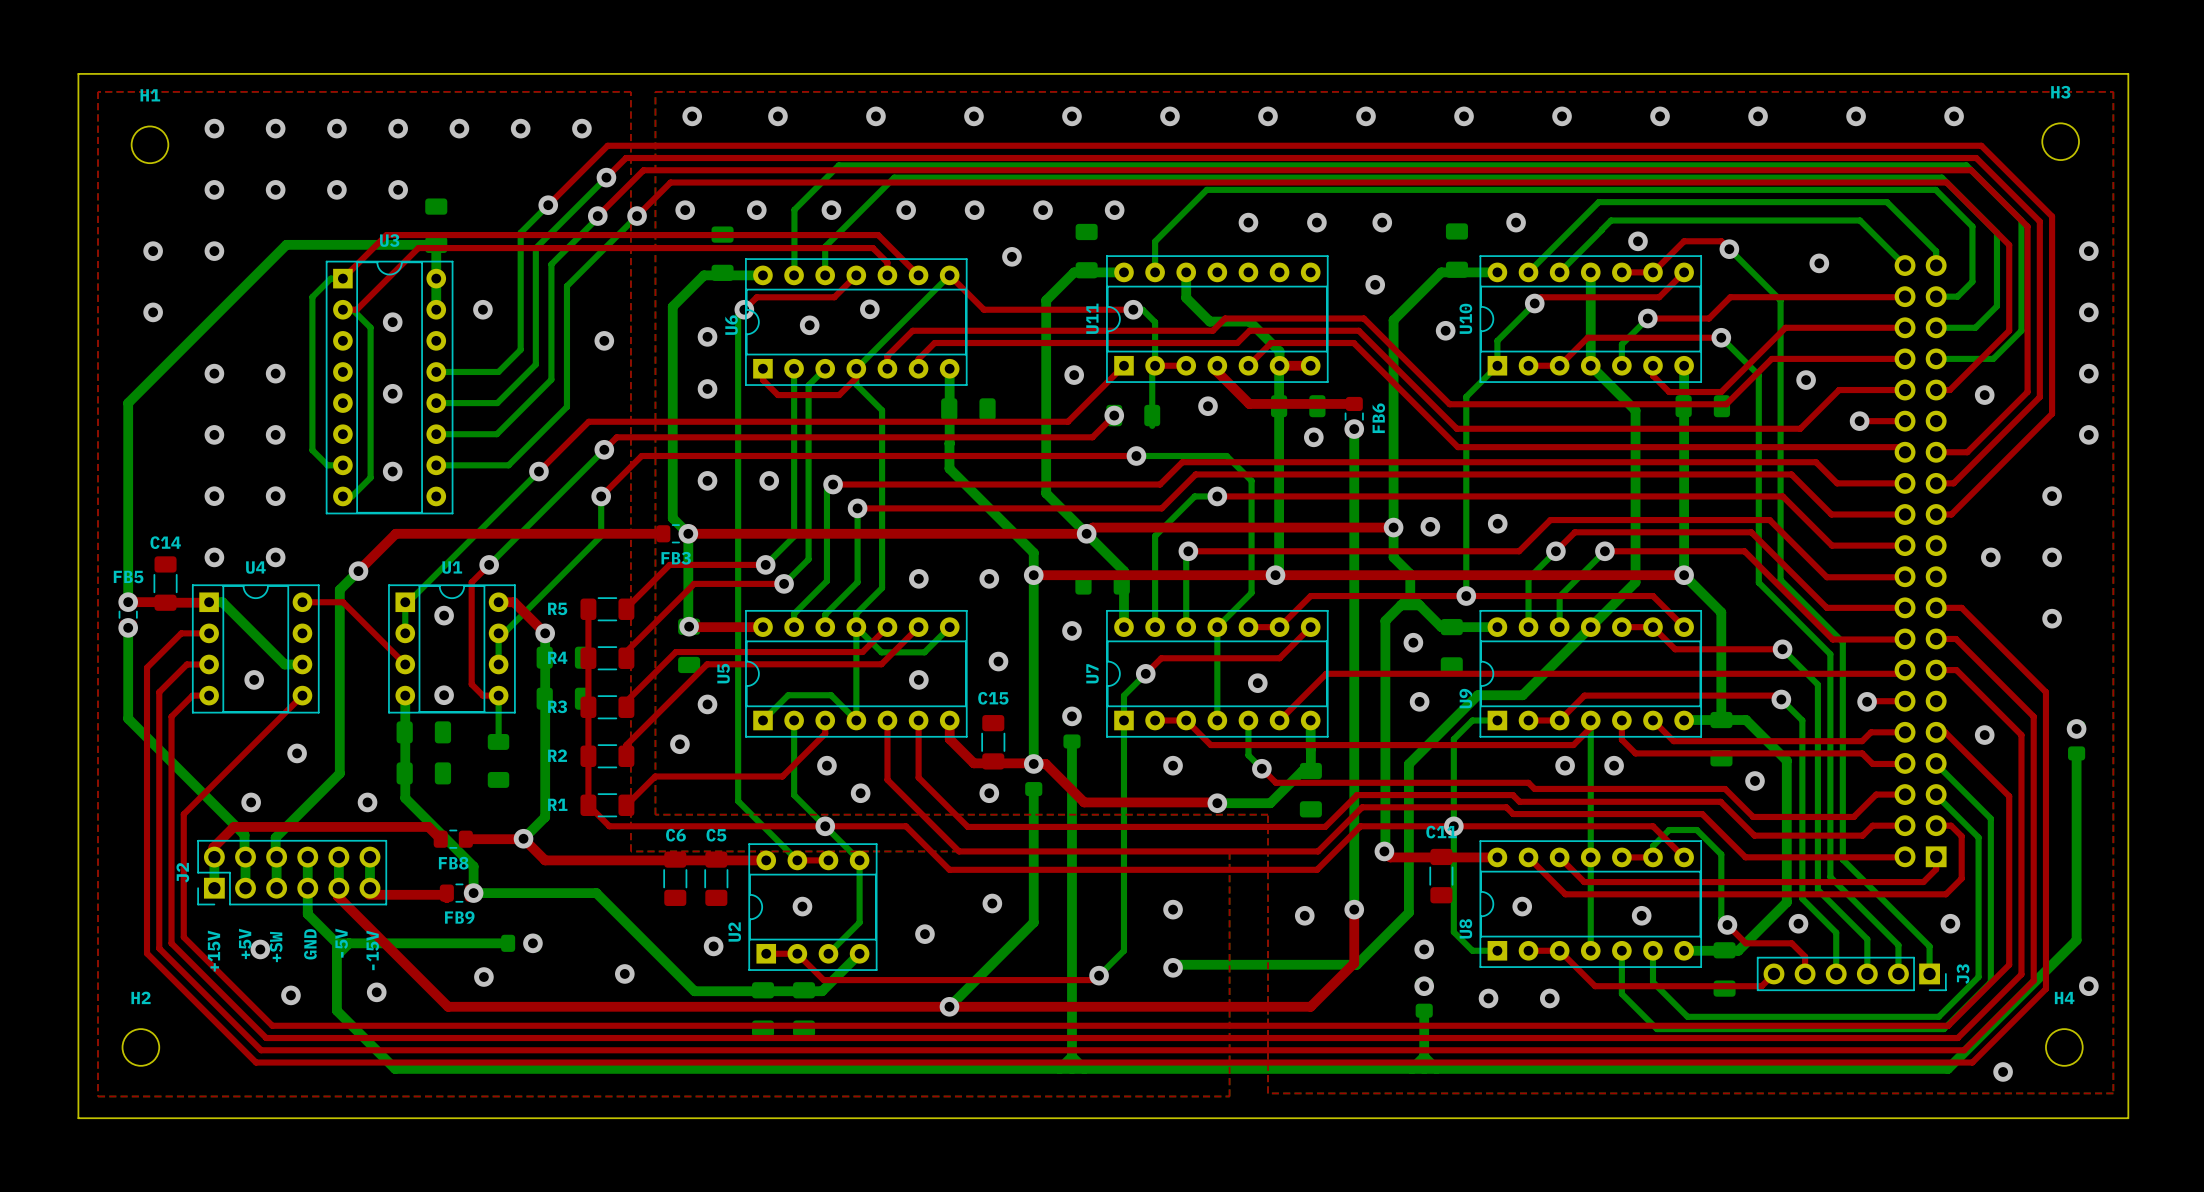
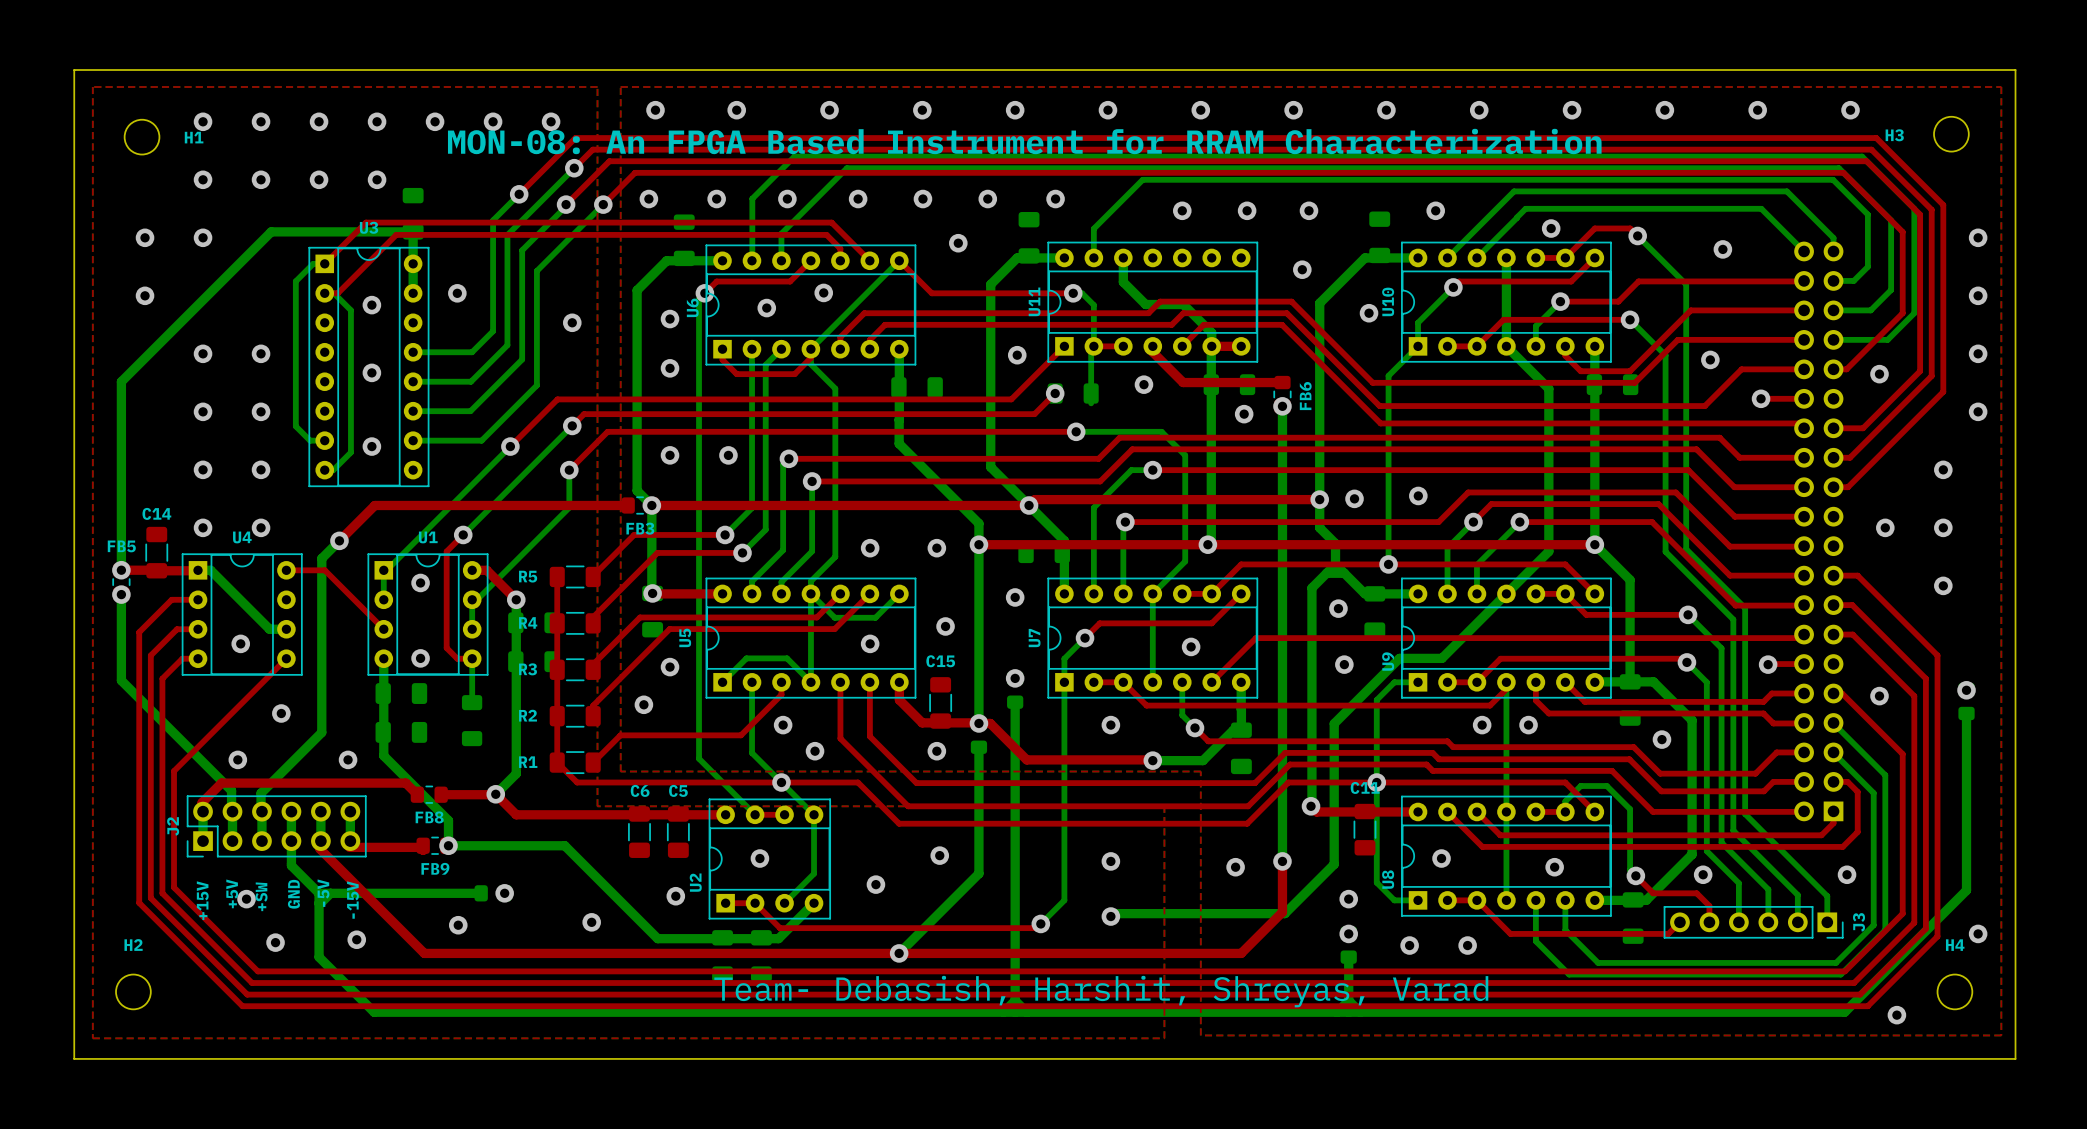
H3 name position: H3 (2060, 92) -> H3 (1894, 135)
H1 name position: H1 (150, 95) -> H1 (194, 137)
text: none -> MON-08: An FPGA Based Instrument for RRAM Characterization (1024, 141)
text: none -> Team- Debasish, Harshit, Shreyas, Varad (1101, 991)

